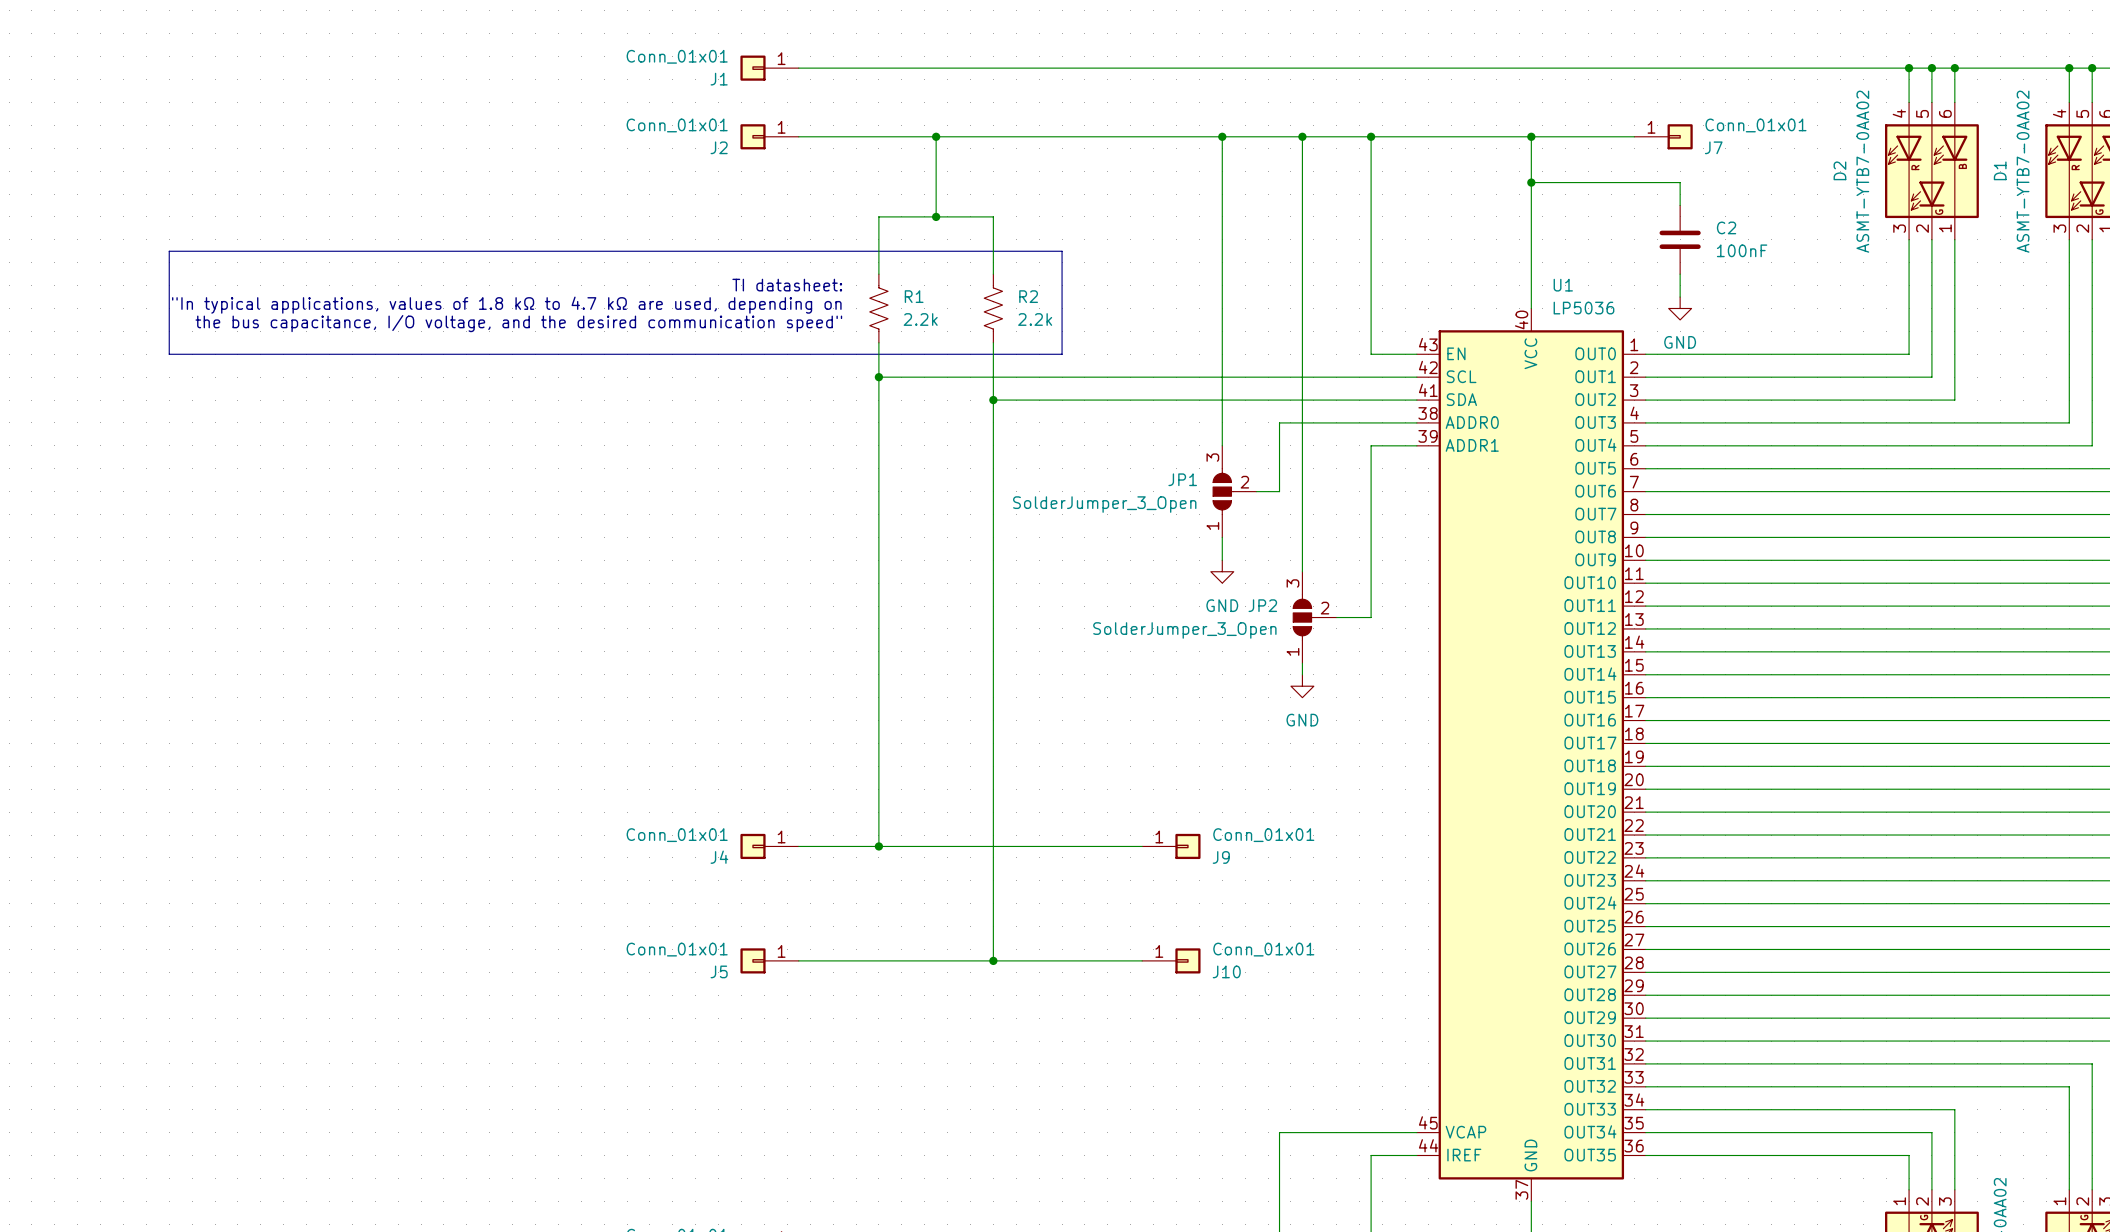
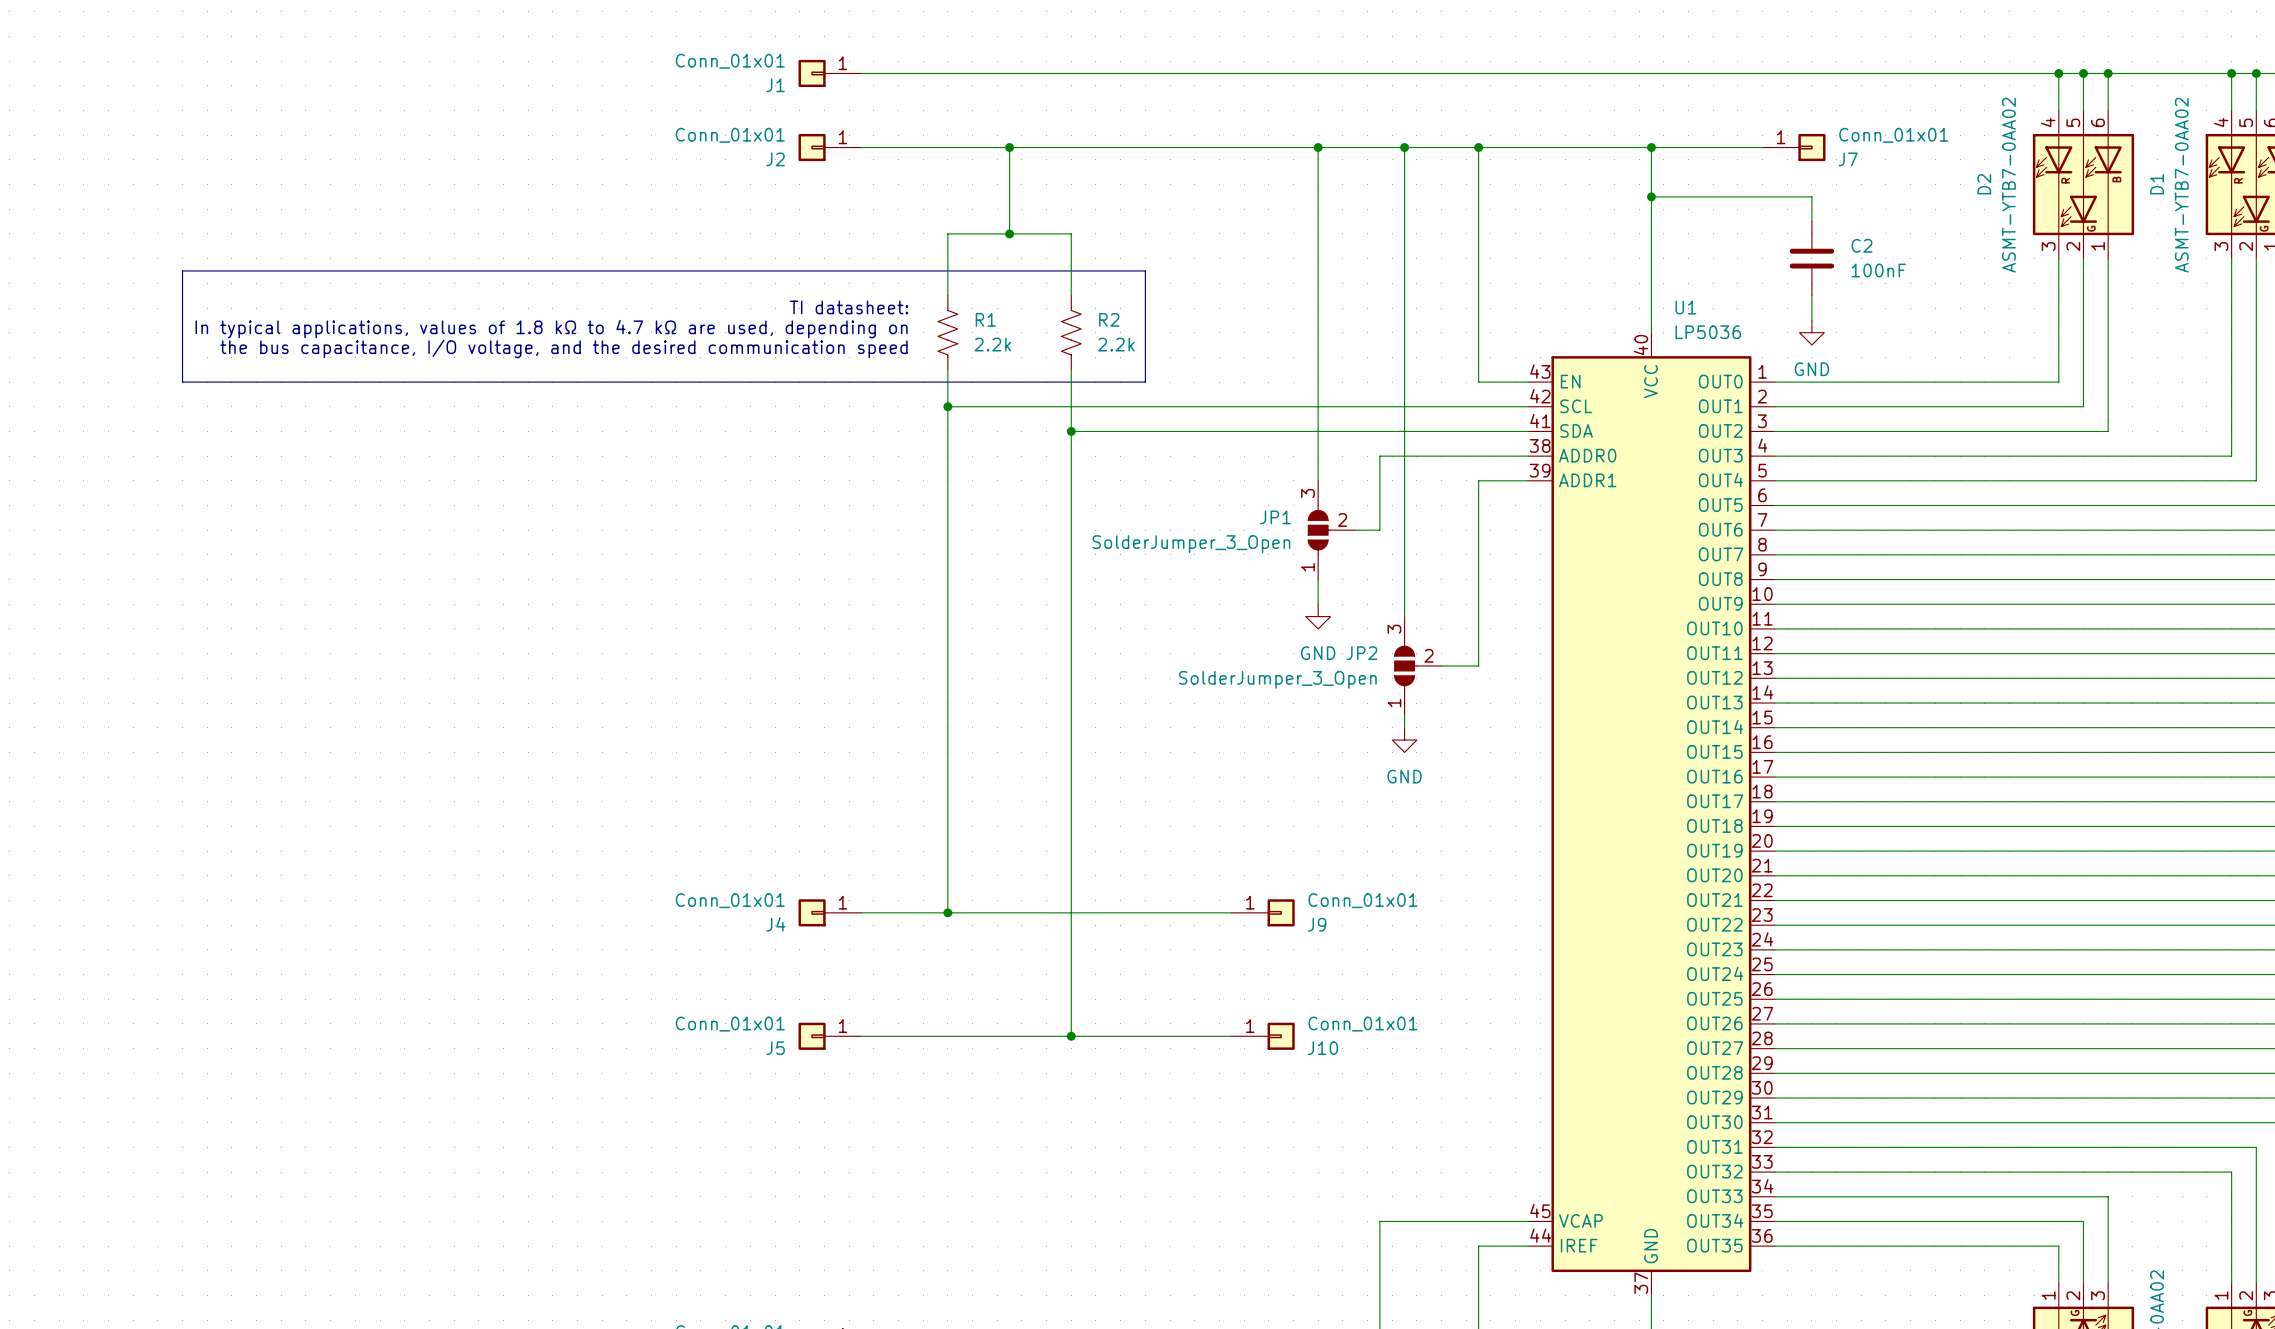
text: "In typical applications, values of 1.8 kΩ to 4.7 kΩ are used, depending on (506, 305) -> In typical applications, values of 1.8 kΩ to 4.7 kΩ are used, depending on (551, 329)
text: the bus capacitance, I/O voltage, and the desired communication speed" (518, 323) -> the bus capacitance, I/O voltage, and the desired communication speed (563, 348)

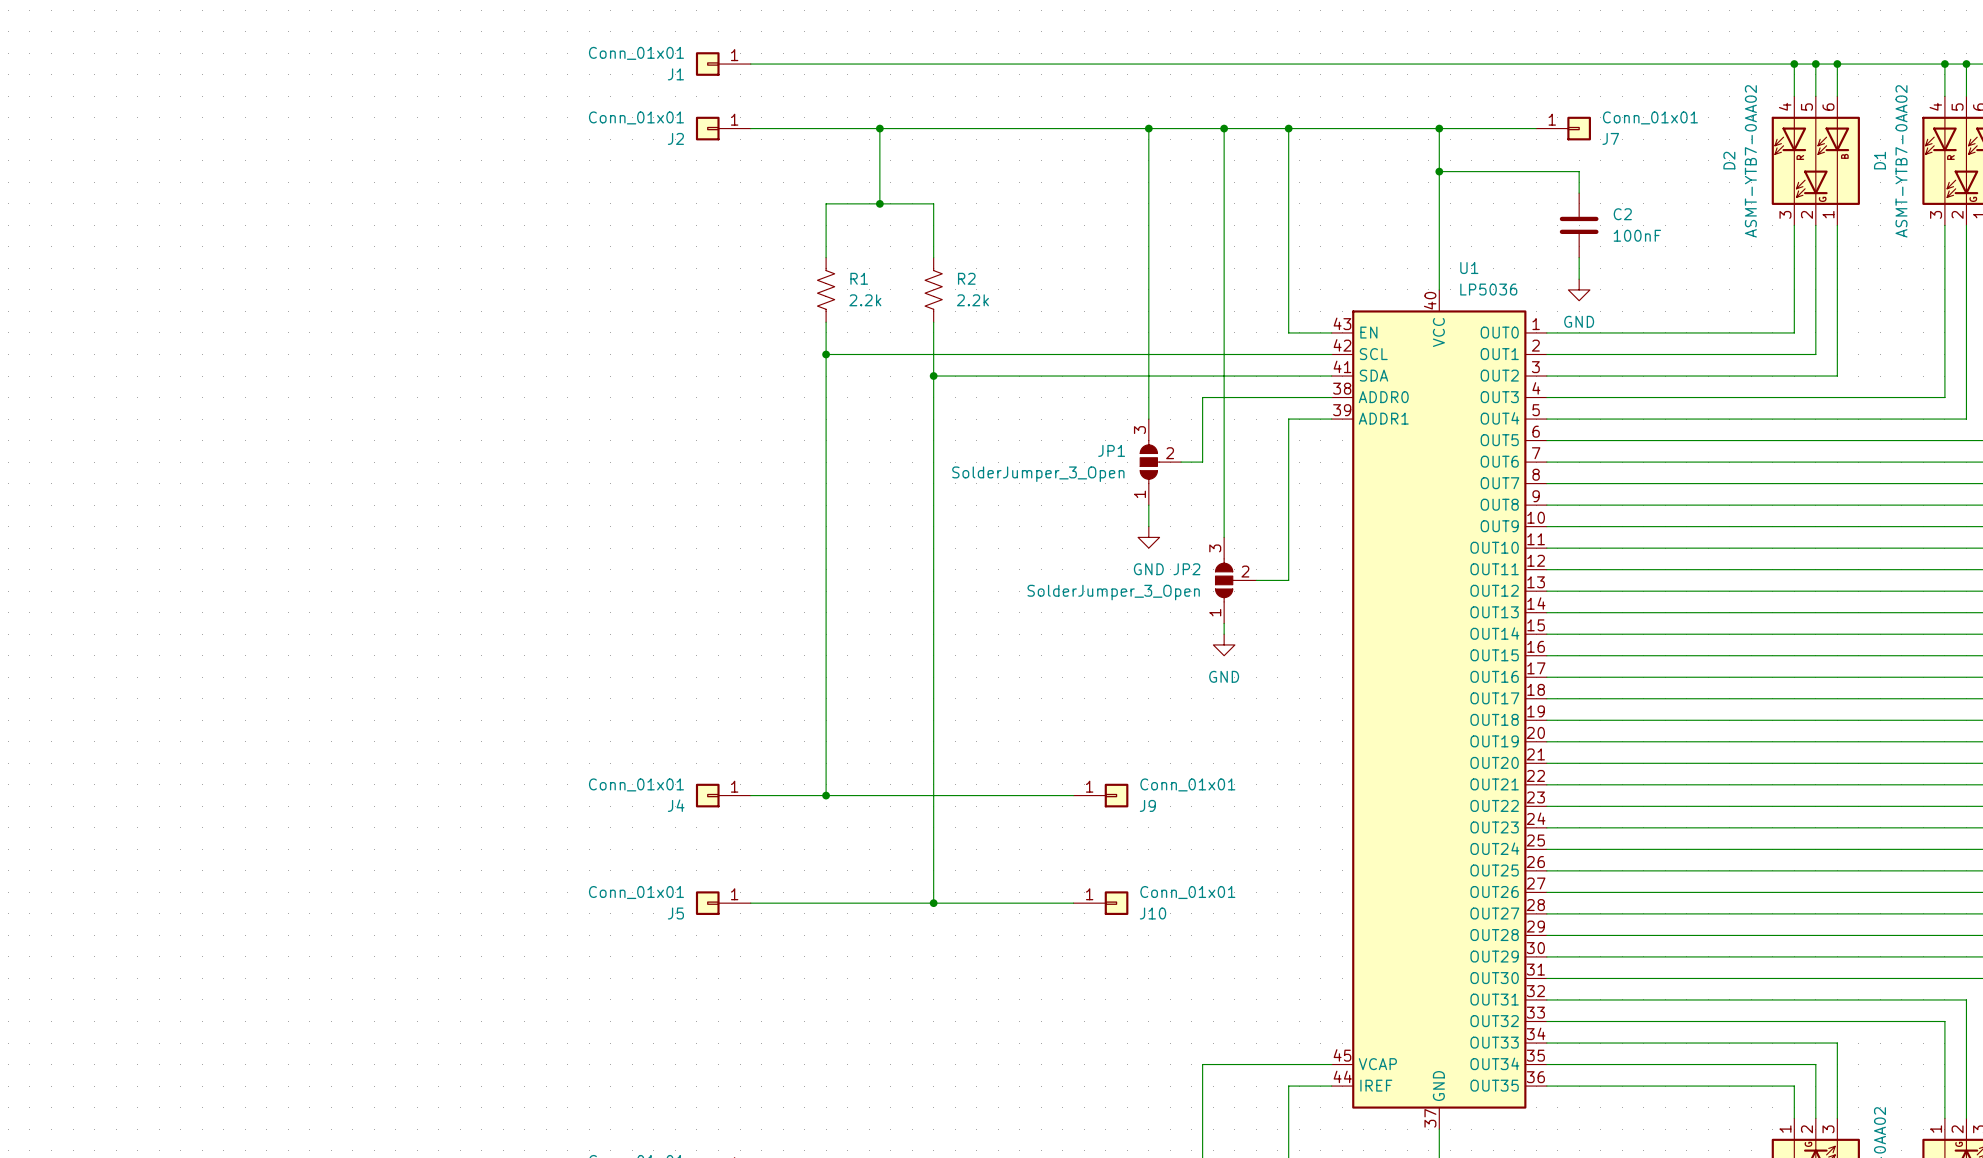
line: (182, 270) (1145, 270) (1145, 382) (182, 382) (182, 270) -> none
text: TI datasheet: (849, 307) -> none
text: In typical applications, values of 1.8 kΩ to 4.7 kΩ are used, depending on (551, 329) -> none
text: the bus capacitance, I/O voltage, and the desired communication speed (563, 348) -> none

